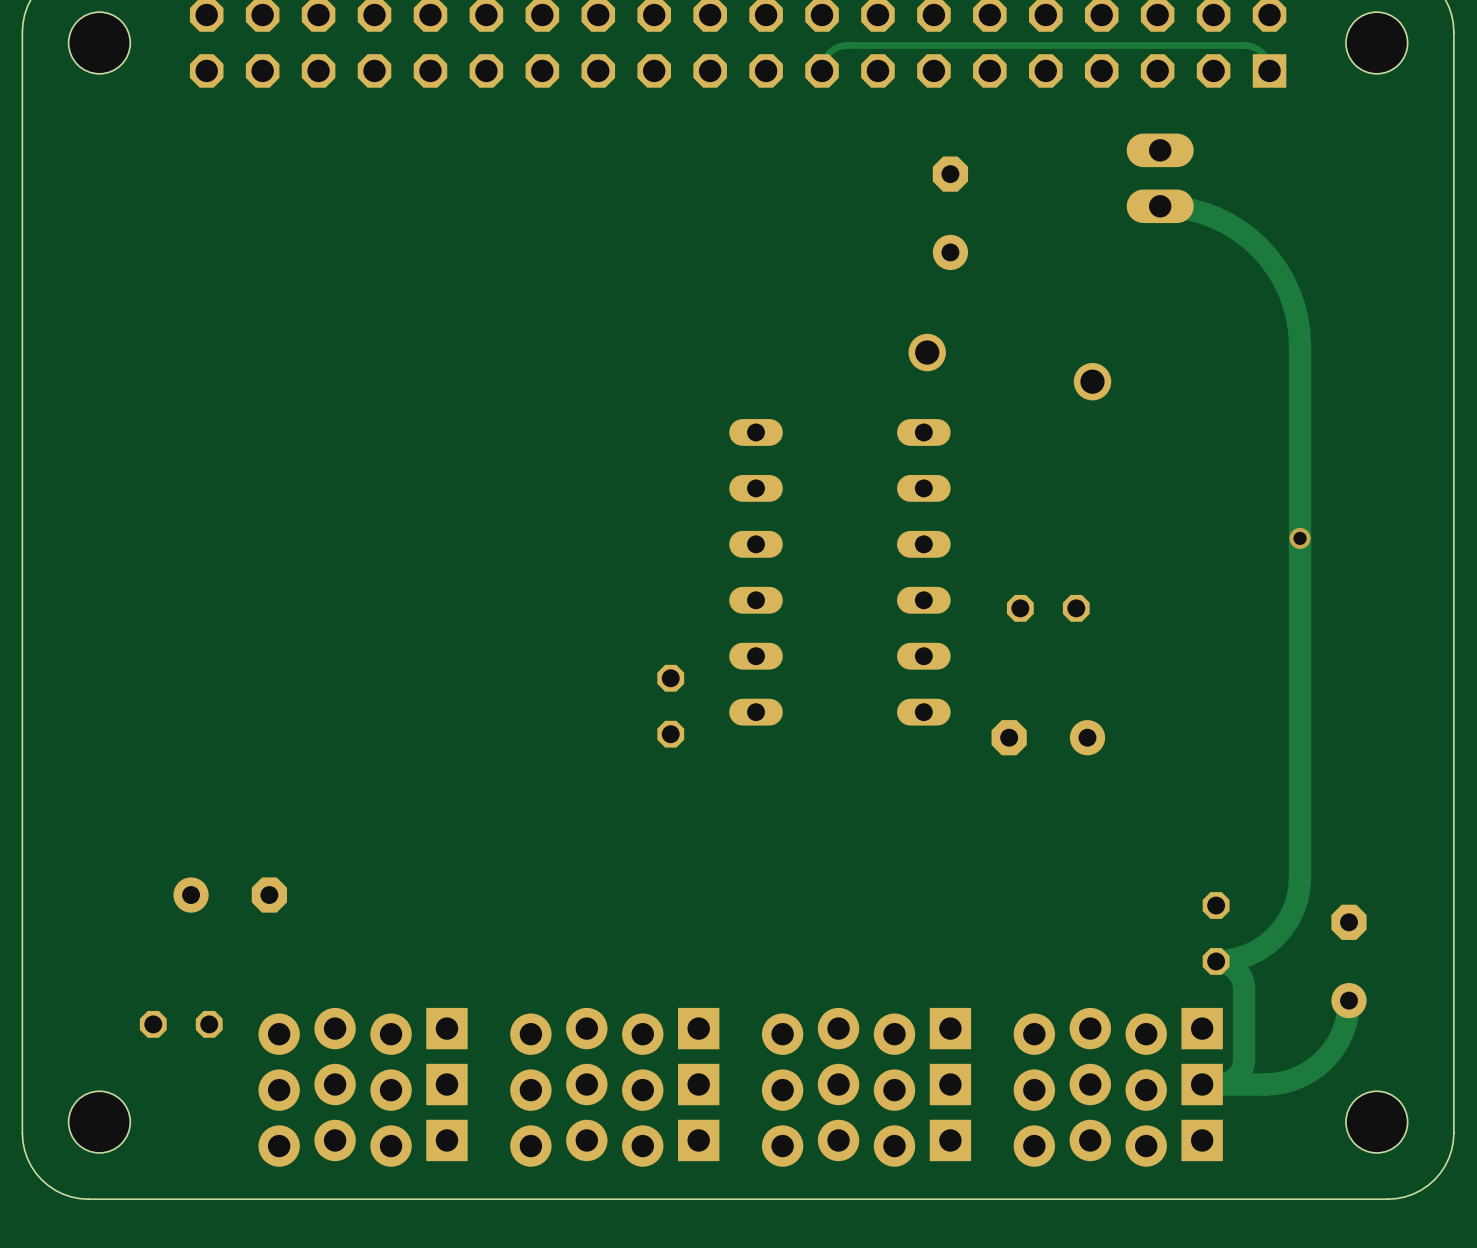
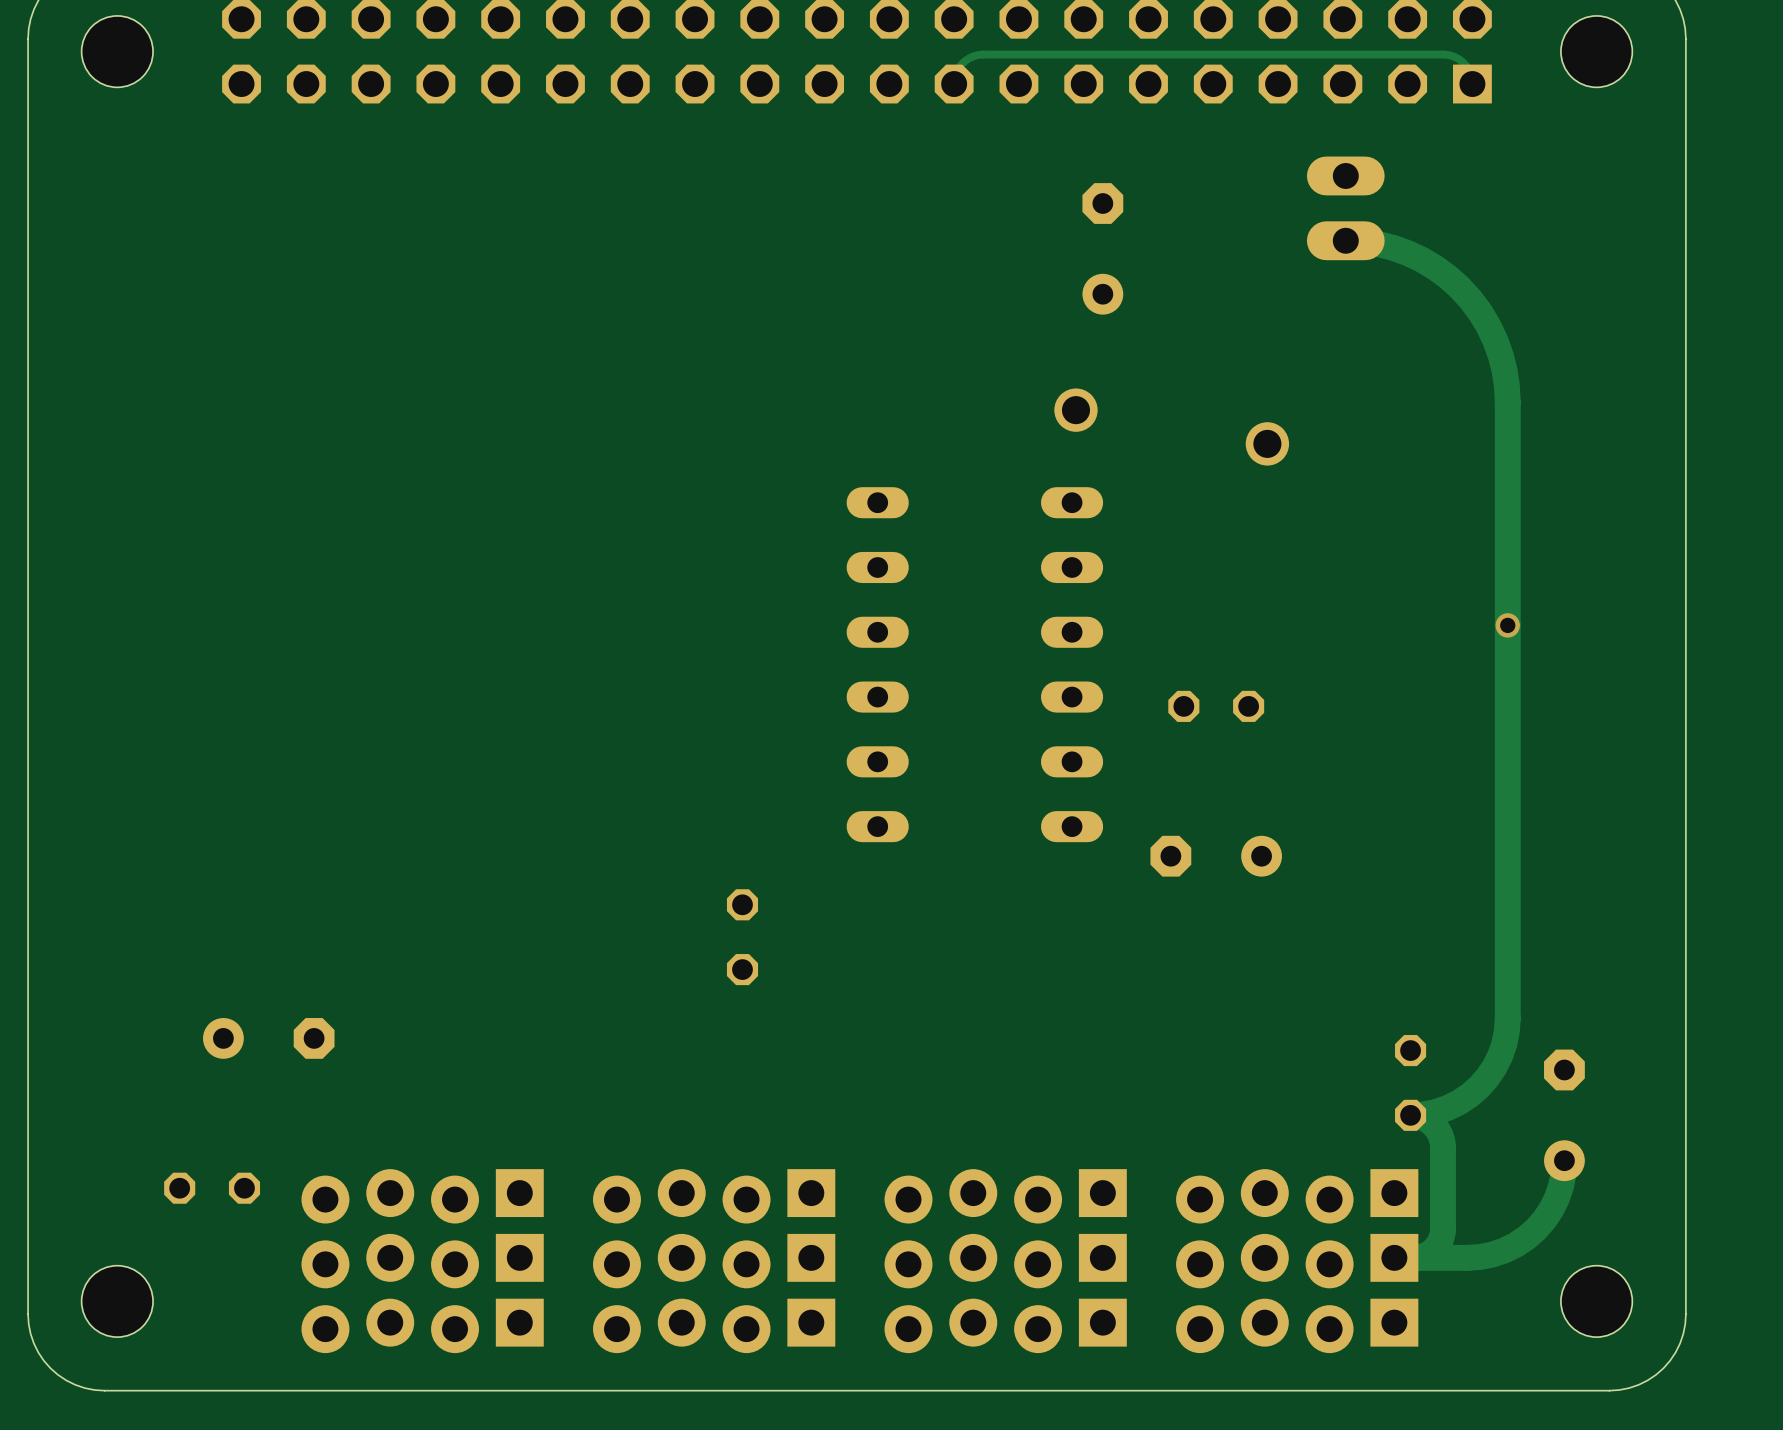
part position: (670, 706) -> (742, 937)

